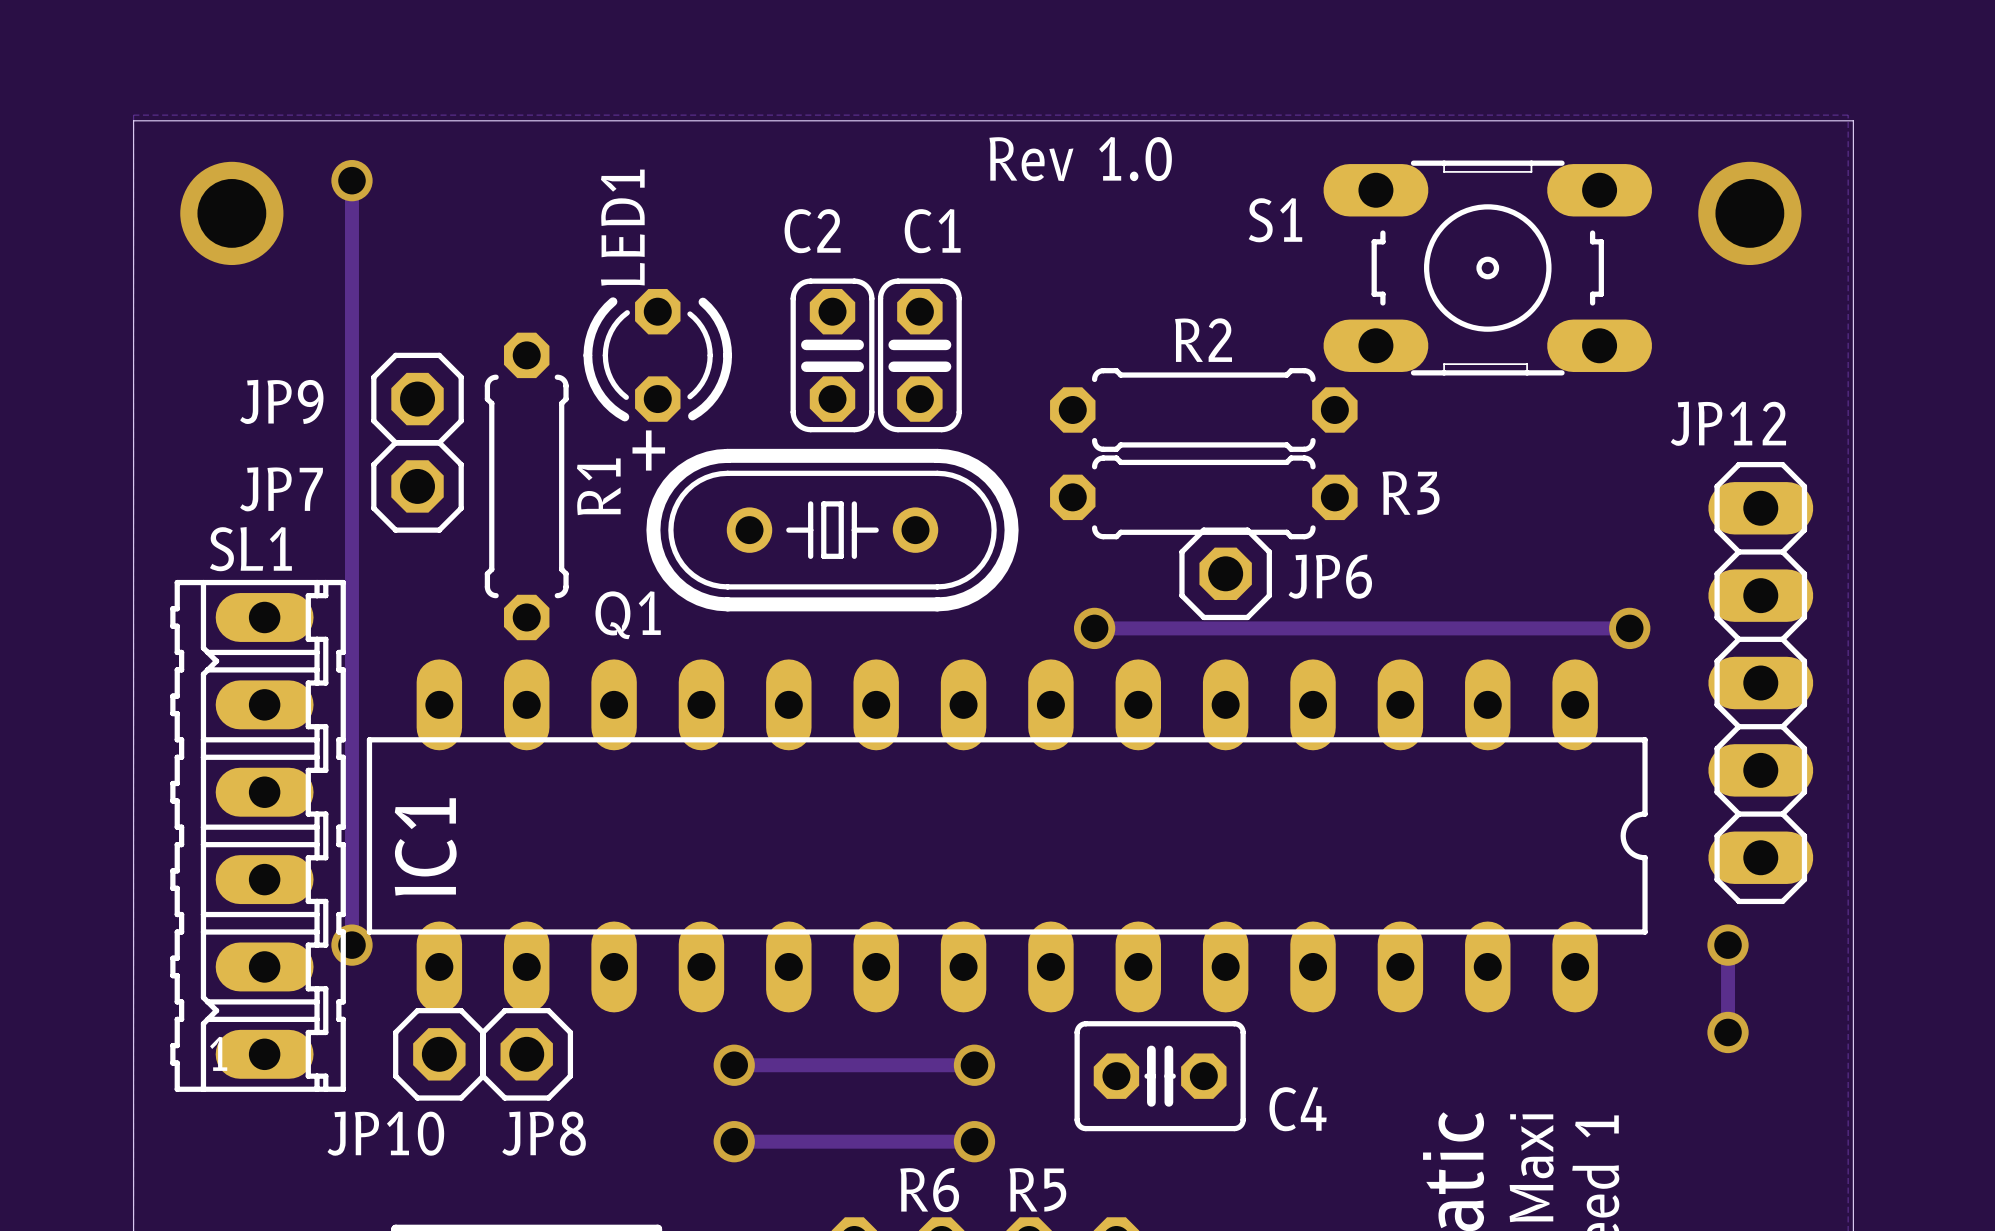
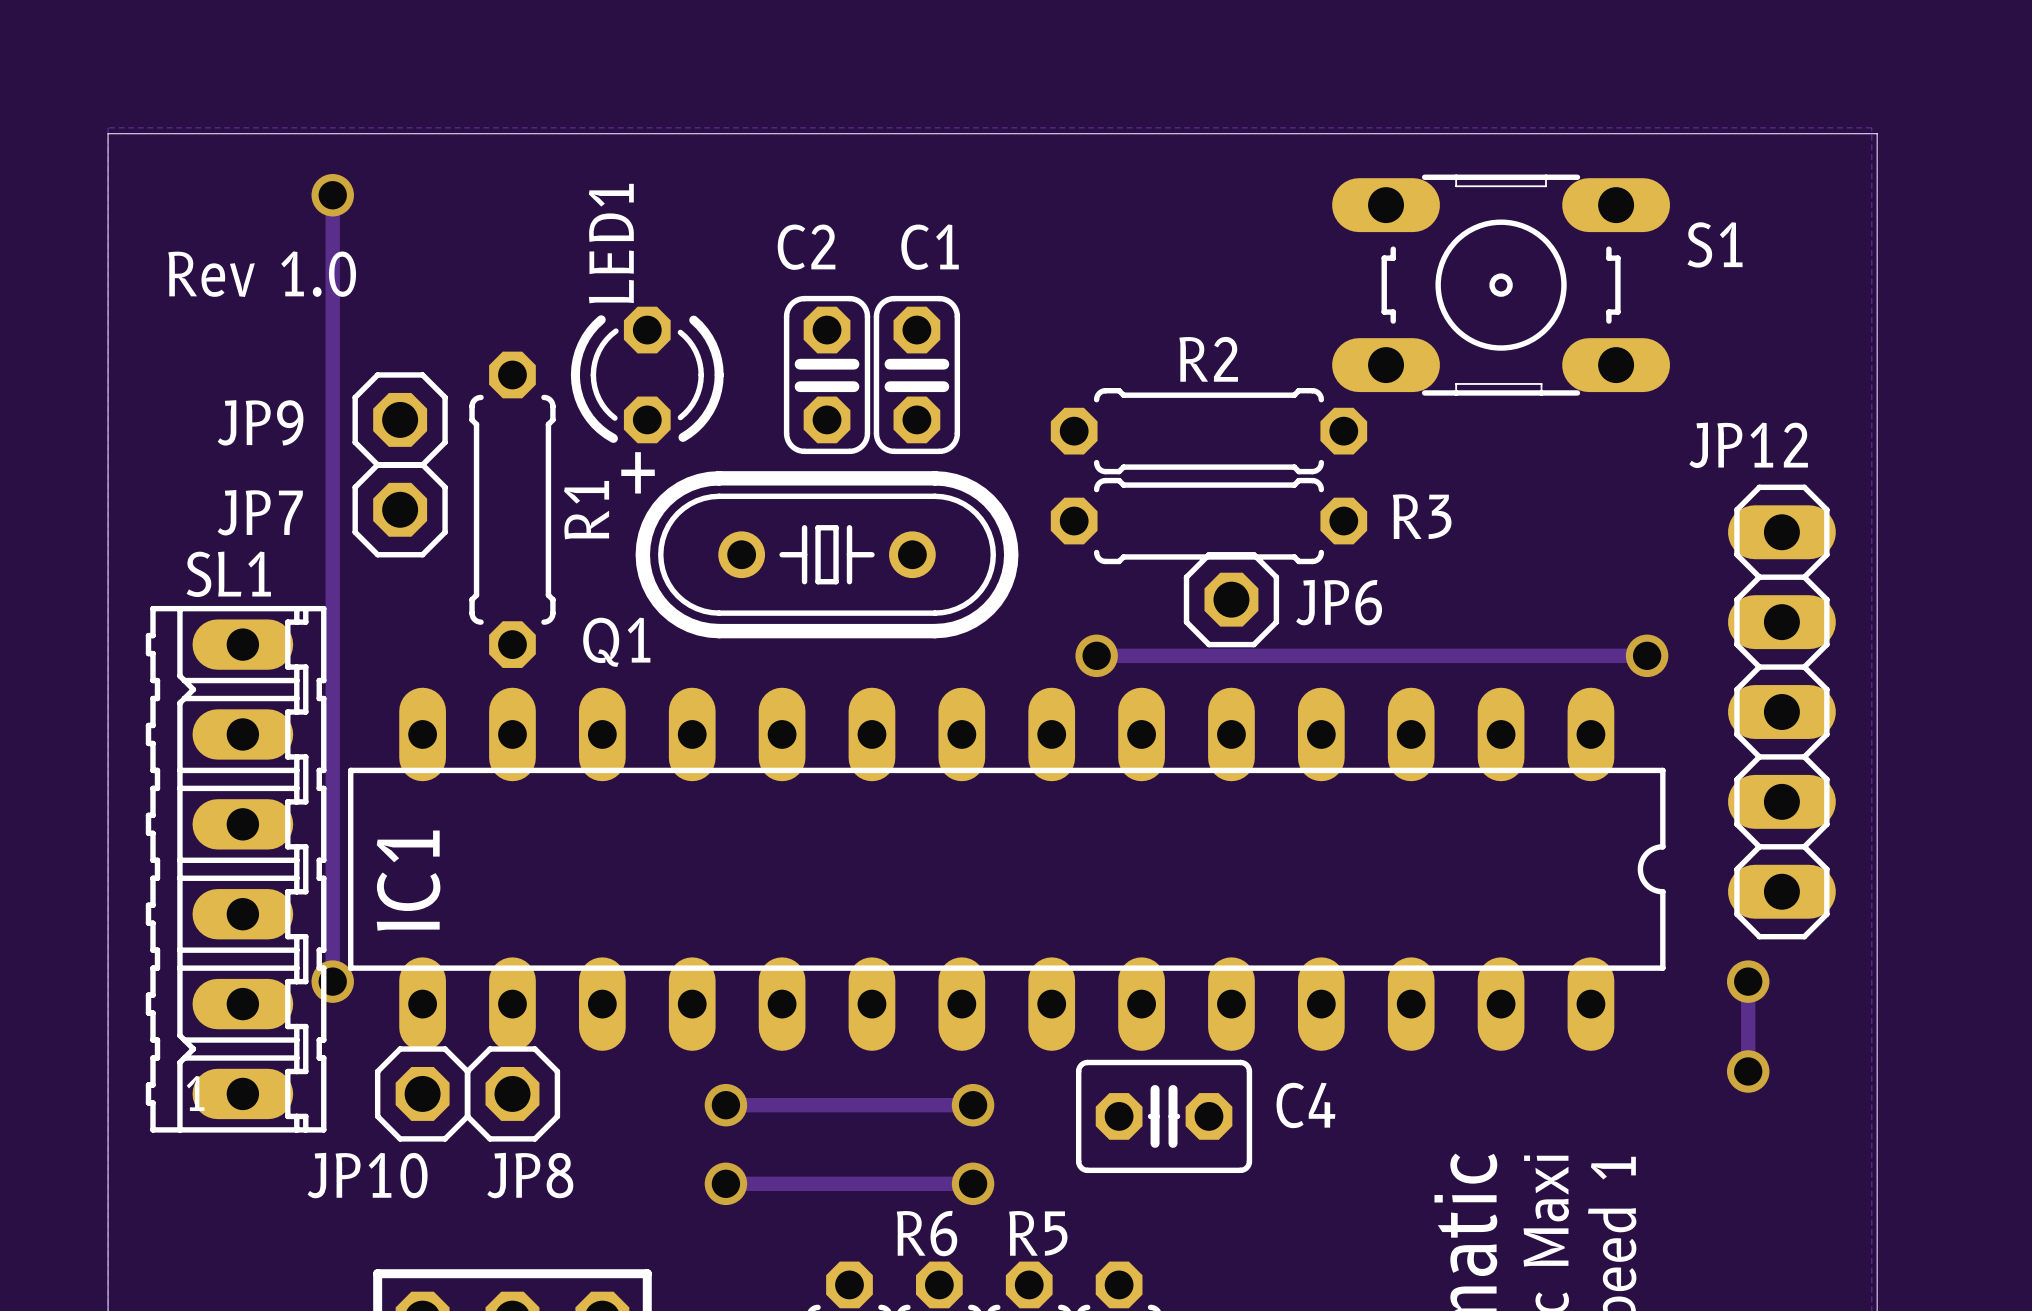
text position: Rev 1.0 (1080, 159) -> Rev 1.0 (262, 274)
via: (231, 213) -> none
via: (1749, 213) -> none
S1 name position: S1 (1275, 220) -> S1 (1715, 244)
C4 name position: C4 (1298, 1109) -> C4 (1305, 1105)

